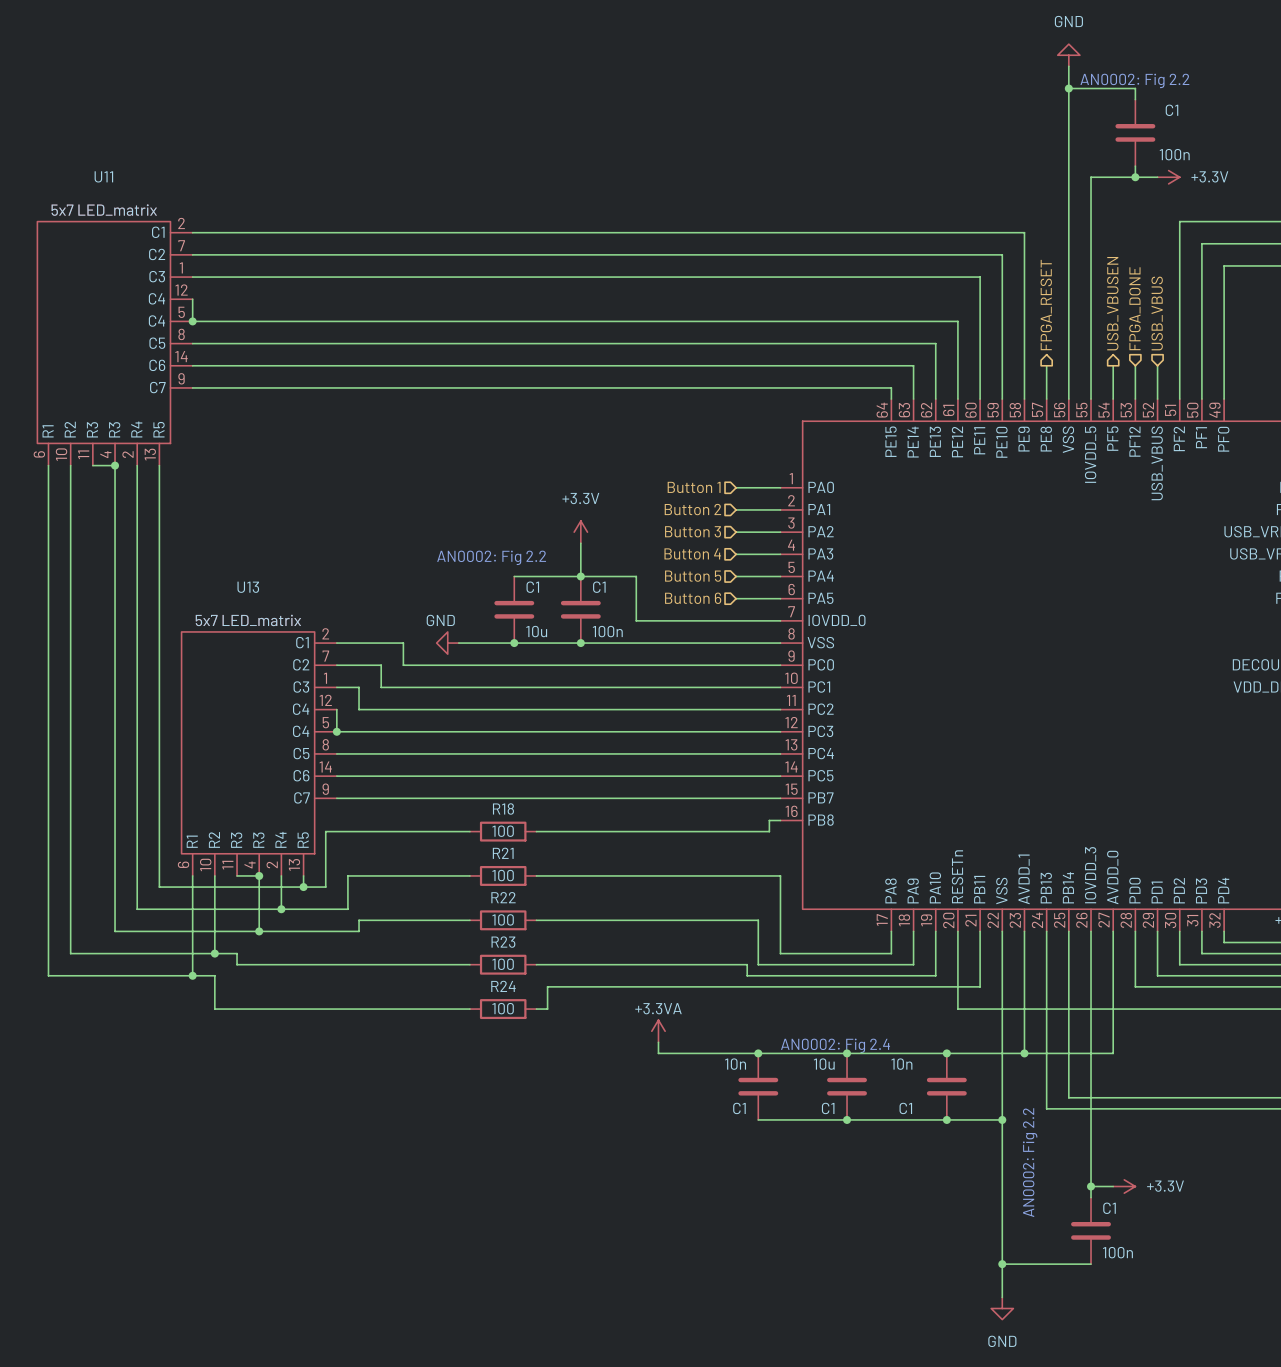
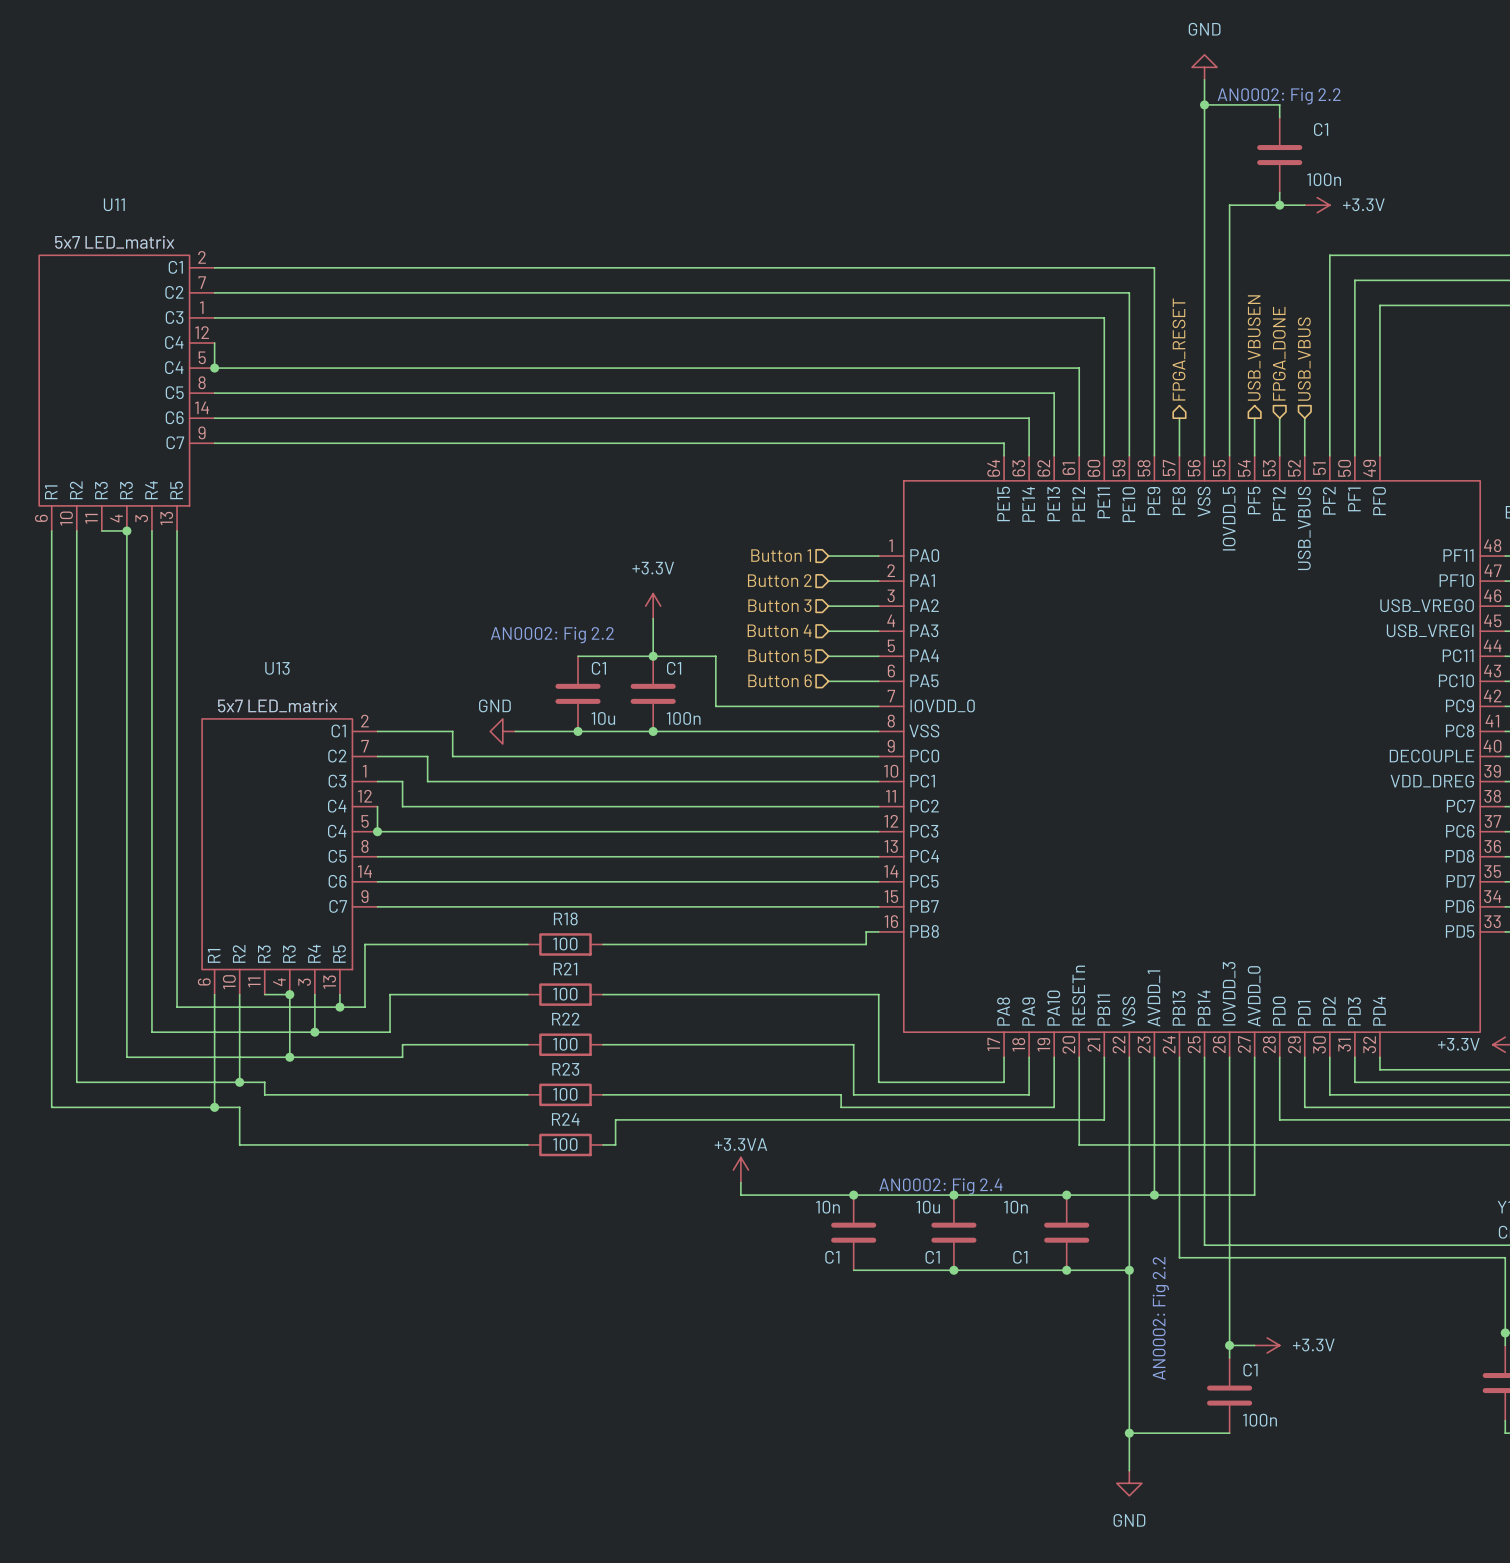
U11 pin number: 2 (127, 454) -> 3 (141, 518)
U13 pin number: 2 (272, 864) -> 3 (304, 982)

